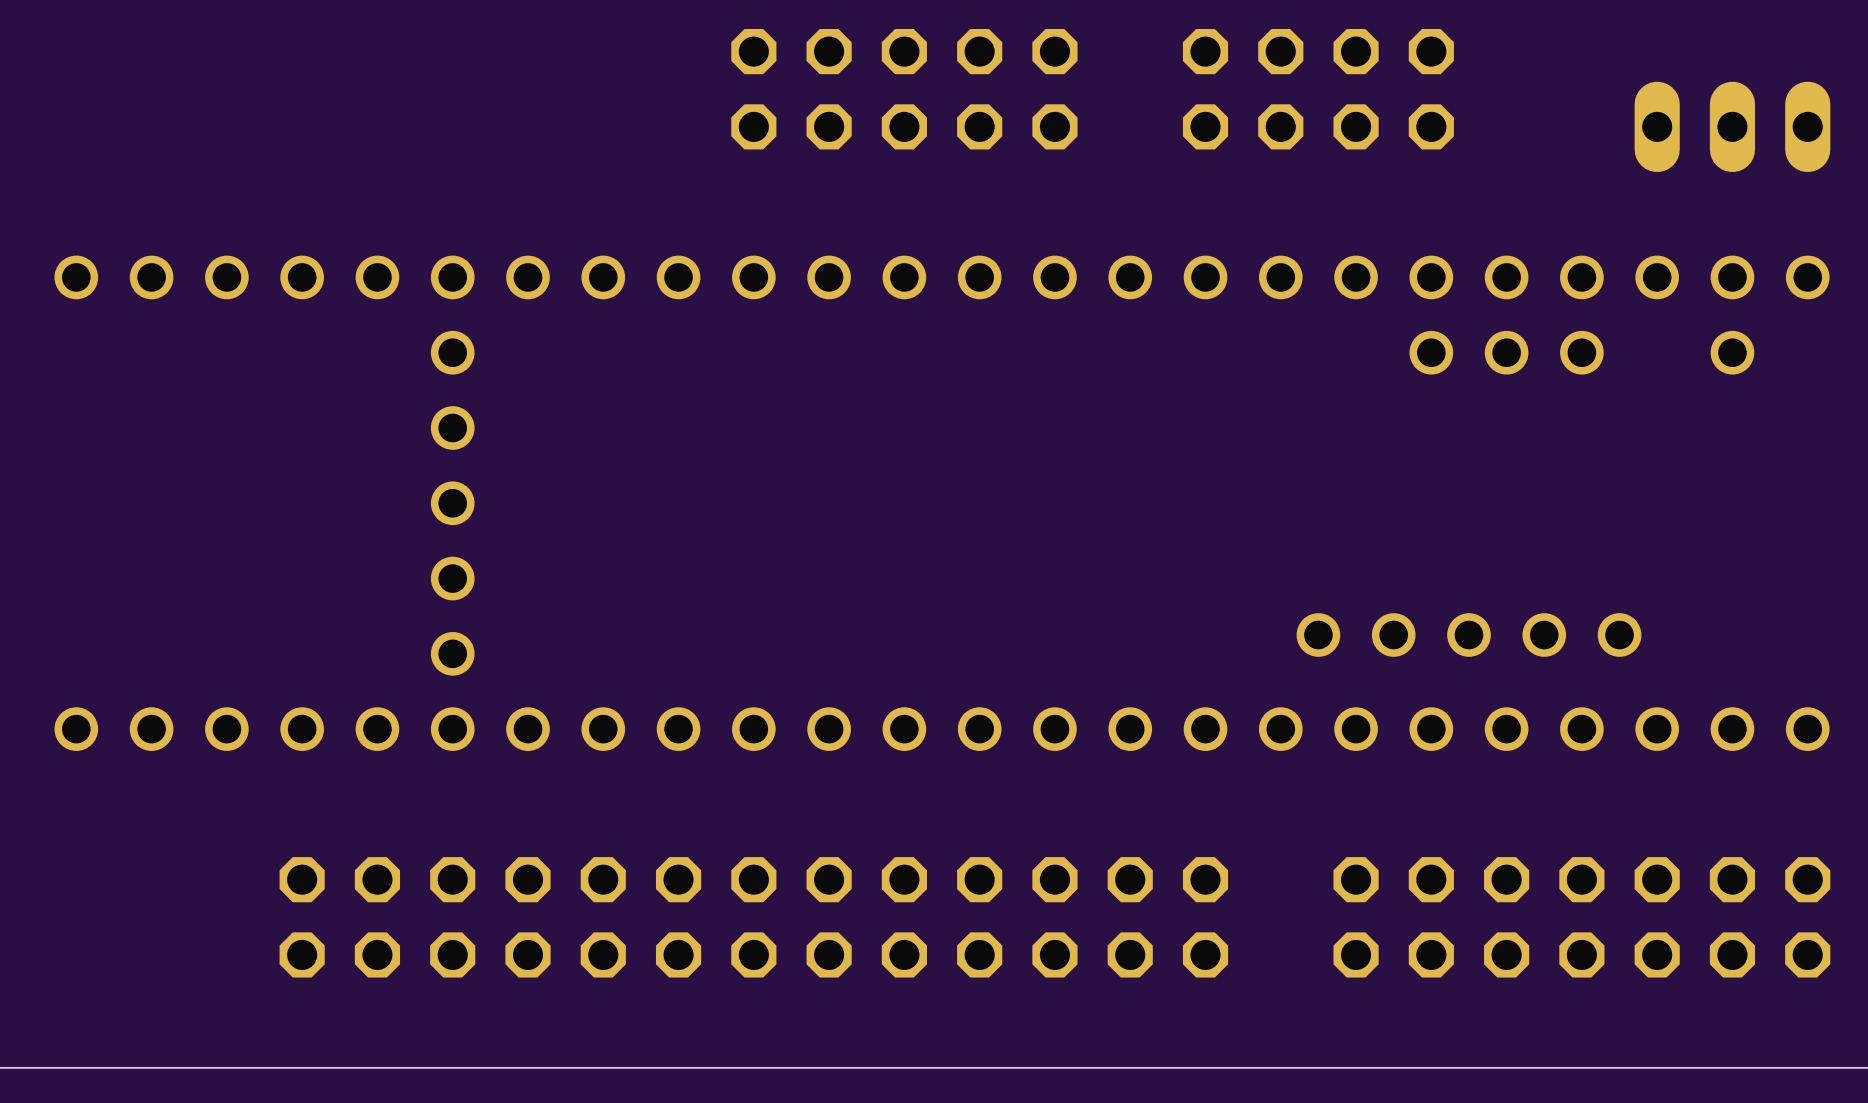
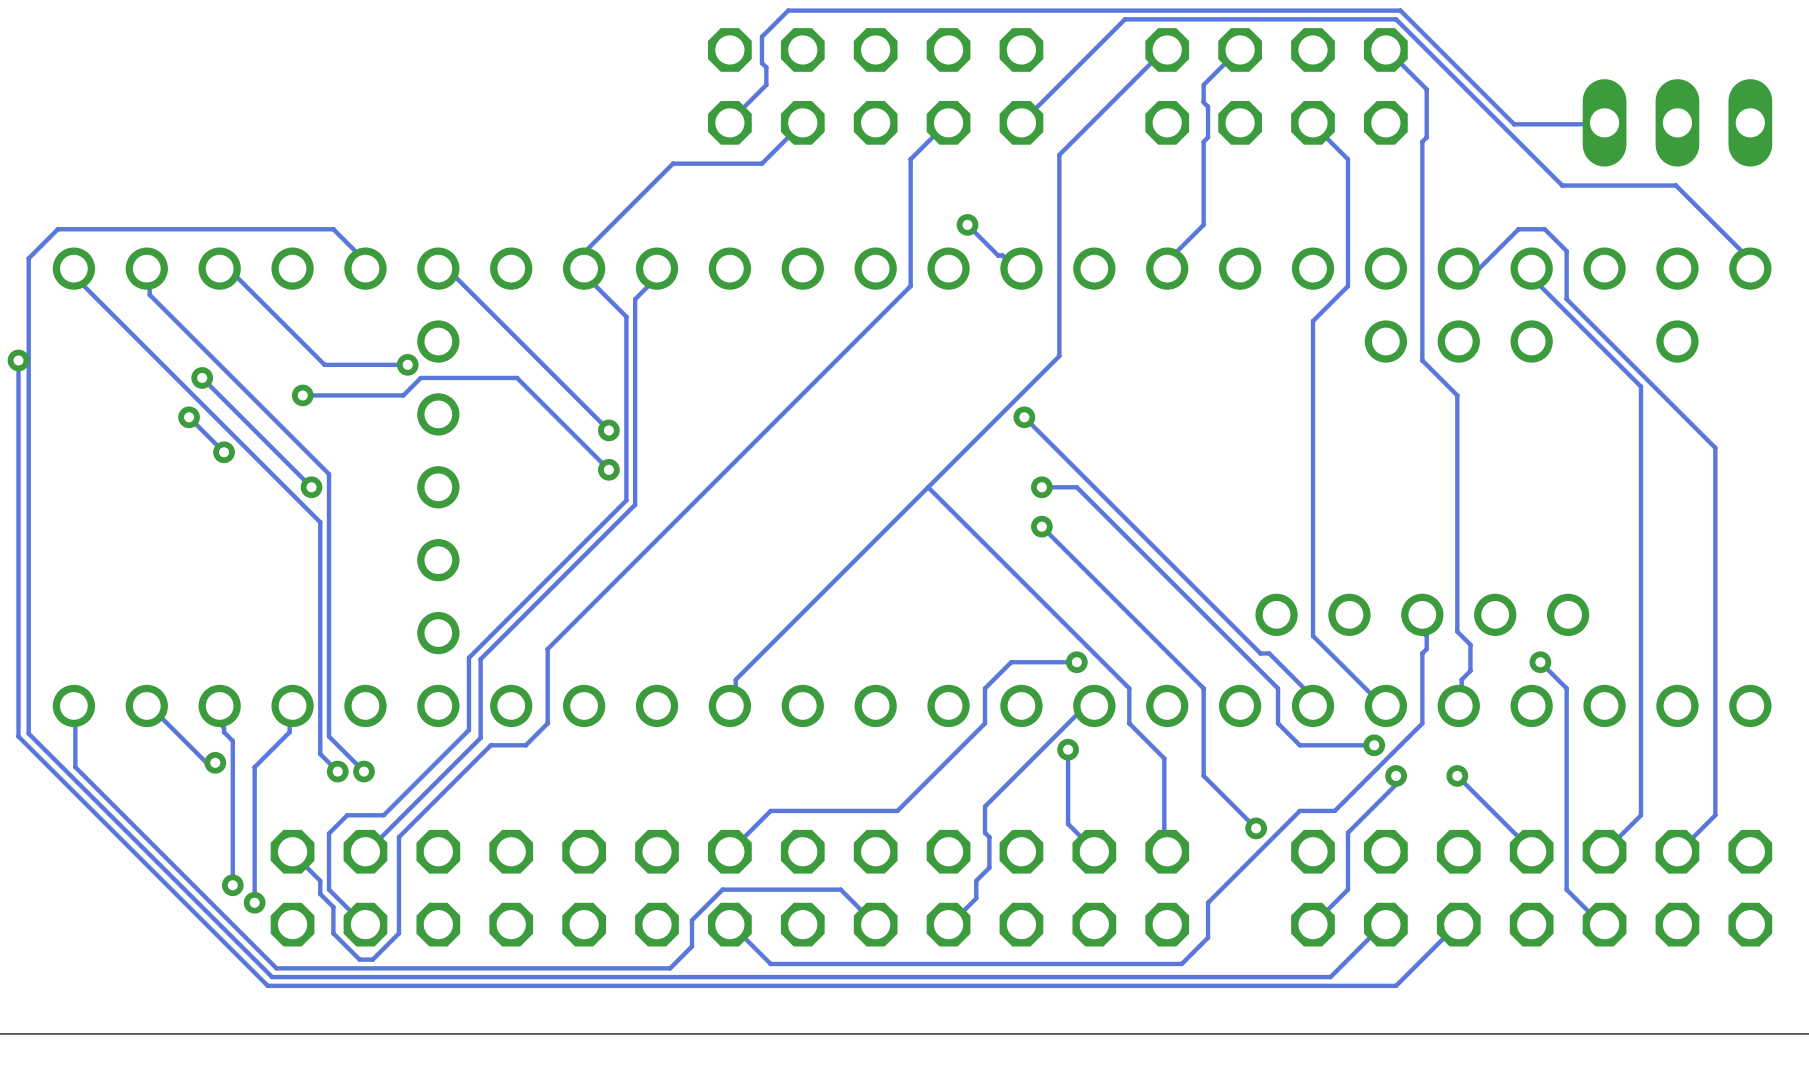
track: none -> (1167, 49) (1164, 49) (1059, 154) (1059, 356) (735, 679) (735, 701) (729, 705)
track: none -> (1240, 49) (1203, 84) (1203, 102) (1208, 106) (1208, 137) (1203, 141) (1203, 224) (1168, 259) (1167, 268)
track: none -> (1385, 49) (1426, 89) (1426, 137) (1422, 141) (1422, 360) (1457, 395) (1457, 631) (1470, 644) (1470, 670) (1461, 679) (1461, 705) (1458, 705)
track: none -> (802, 122) (761, 163) (673, 163) (584, 252) (584, 274) (626, 316) (626, 500) (468, 657) (468, 730) (383, 815) (347, 815) (329, 833) (329, 889) (365, 924)
track: none -> (948, 122) (910, 159) (910, 286) (547, 649) (547, 723) (525, 745) (490, 745) (398, 837) (398, 933) (372, 959) (359, 959) (333, 933) (333, 907) (320, 894) (320, 880) (292, 851)
track: none -> (1021, 122) (1124, 19) (1396, 19) (1562, 185) (1675, 185) (1750, 259) (1750, 268)
track: none -> (1313, 122) (1347, 159) (1347, 286) (1313, 321) (1313, 635) (1382, 705) (1385, 705)
track: none -> (1604, 122) (1514, 124) (1400, 10) (788, 10) (761, 36) (761, 63) (766, 67) (766, 84) (729, 122)
track: none -> (967, 224) (998, 255) (1002, 255) (1015, 268) (1021, 268)
via: none -> (967, 224)
track: none -> (73, 268) (75, 277) (320, 522) (320, 754) (337, 771)
track: none -> (146, 268) (149, 268) (149, 294) (329, 474) (329, 736) (364, 771)
track: none -> (219, 268) (228, 268) (324, 364) (407, 364)
track: none -> (365, 268) (364, 259) (333, 229) (57, 229) (28, 258) (28, 733) (272, 977) (1330, 977) (1382, 924) (1385, 924)
track: none -> (438, 268) (447, 268) (608, 430)
track: none -> (657, 268) (657, 277) (635, 299) (635, 504) (480, 659) (480, 738) (365, 851)
track: none -> (1458, 268) (1479, 268) (1518, 229) (1544, 229) (1566, 251) (1566, 299) (1715, 447) (1715, 815) (1677, 851)
track: none -> (1531, 268) (1531, 277) (1641, 386) (1641, 815) (1604, 851)
track: none -> (18, 360) (18, 736) (267, 985) (1396, 985) (1458, 924)
via: none -> (18, 360)
via: none -> (407, 364)
track: none -> (202, 377) (311, 487)
via: none -> (202, 377)
track: none -> (302, 395) (403, 395) (420, 377) (517, 377) (608, 469)
via: none -> (302, 395)
track: none -> (189, 417) (224, 452)
via: none -> (189, 417)
track: none -> (1024, 417) (1260, 653) (1269, 653) (1313, 697) (1313, 705)
via: none -> (1024, 417)
via: none -> (608, 430)
via: none -> (224, 452)
via: none -> (608, 469)
via: none -> (311, 487)
track: none -> (928, 487) (1129, 688) (1129, 723) (1164, 758) (1164, 850) (1167, 851)
track: none -> (1041, 487) (1076, 487) (1278, 688) (1278, 723) (1299, 745) (1374, 745)
via: none -> (1041, 487)
track: none -> (1041, 526) (1203, 688) (1203, 775) (1256, 828)
via: none -> (1041, 526)
track: none -> (1422, 614) (1422, 631) (1426, 635) (1426, 649) (1422, 653) (1422, 723) (1334, 810) (1299, 810) (1208, 902) (1208, 937) (1181, 963) (770, 963) (729, 924)
track: none -> (1076, 662) (1011, 662) (985, 688) (985, 723) (897, 810) (770, 810) (729, 851)
via: none -> (1076, 662)
track: none -> (1540, 662) (1566, 688) (1566, 889) (1601, 924) (1604, 924)
via: none -> (1540, 662)
track: none -> (73, 705) (75, 767) (276, 968) (670, 968) (691, 946) (691, 920) (722, 889) (840, 889) (875, 924)
track: none -> (146, 705) (149, 705) (206, 762) (215, 762)
track: none -> (219, 705) (219, 723) (224, 727) (224, 732) (232, 740) (232, 885)
track: none -> (292, 705) (289, 705) (289, 732) (254, 767) (254, 902)
track: none -> (1094, 705) (1085, 705) (985, 806) (985, 832) (989, 837) (989, 867) (976, 880) (976, 898) (948, 924)
via: none -> (1374, 745)
track: none -> (1068, 749) (1068, 824) (1094, 851)
via: none -> (1068, 749)
via: none -> (215, 762)
via: none -> (337, 771)
via: none -> (364, 771)
track: none -> (1396, 775) (1396, 784) (1347, 832) (1347, 889) (1313, 924)
via: none -> (1396, 775)
track: none -> (1457, 775) (1531, 851)
via: none -> (1457, 775)
via: none -> (1256, 828)
via: none -> (232, 885)
via: none -> (254, 902)

